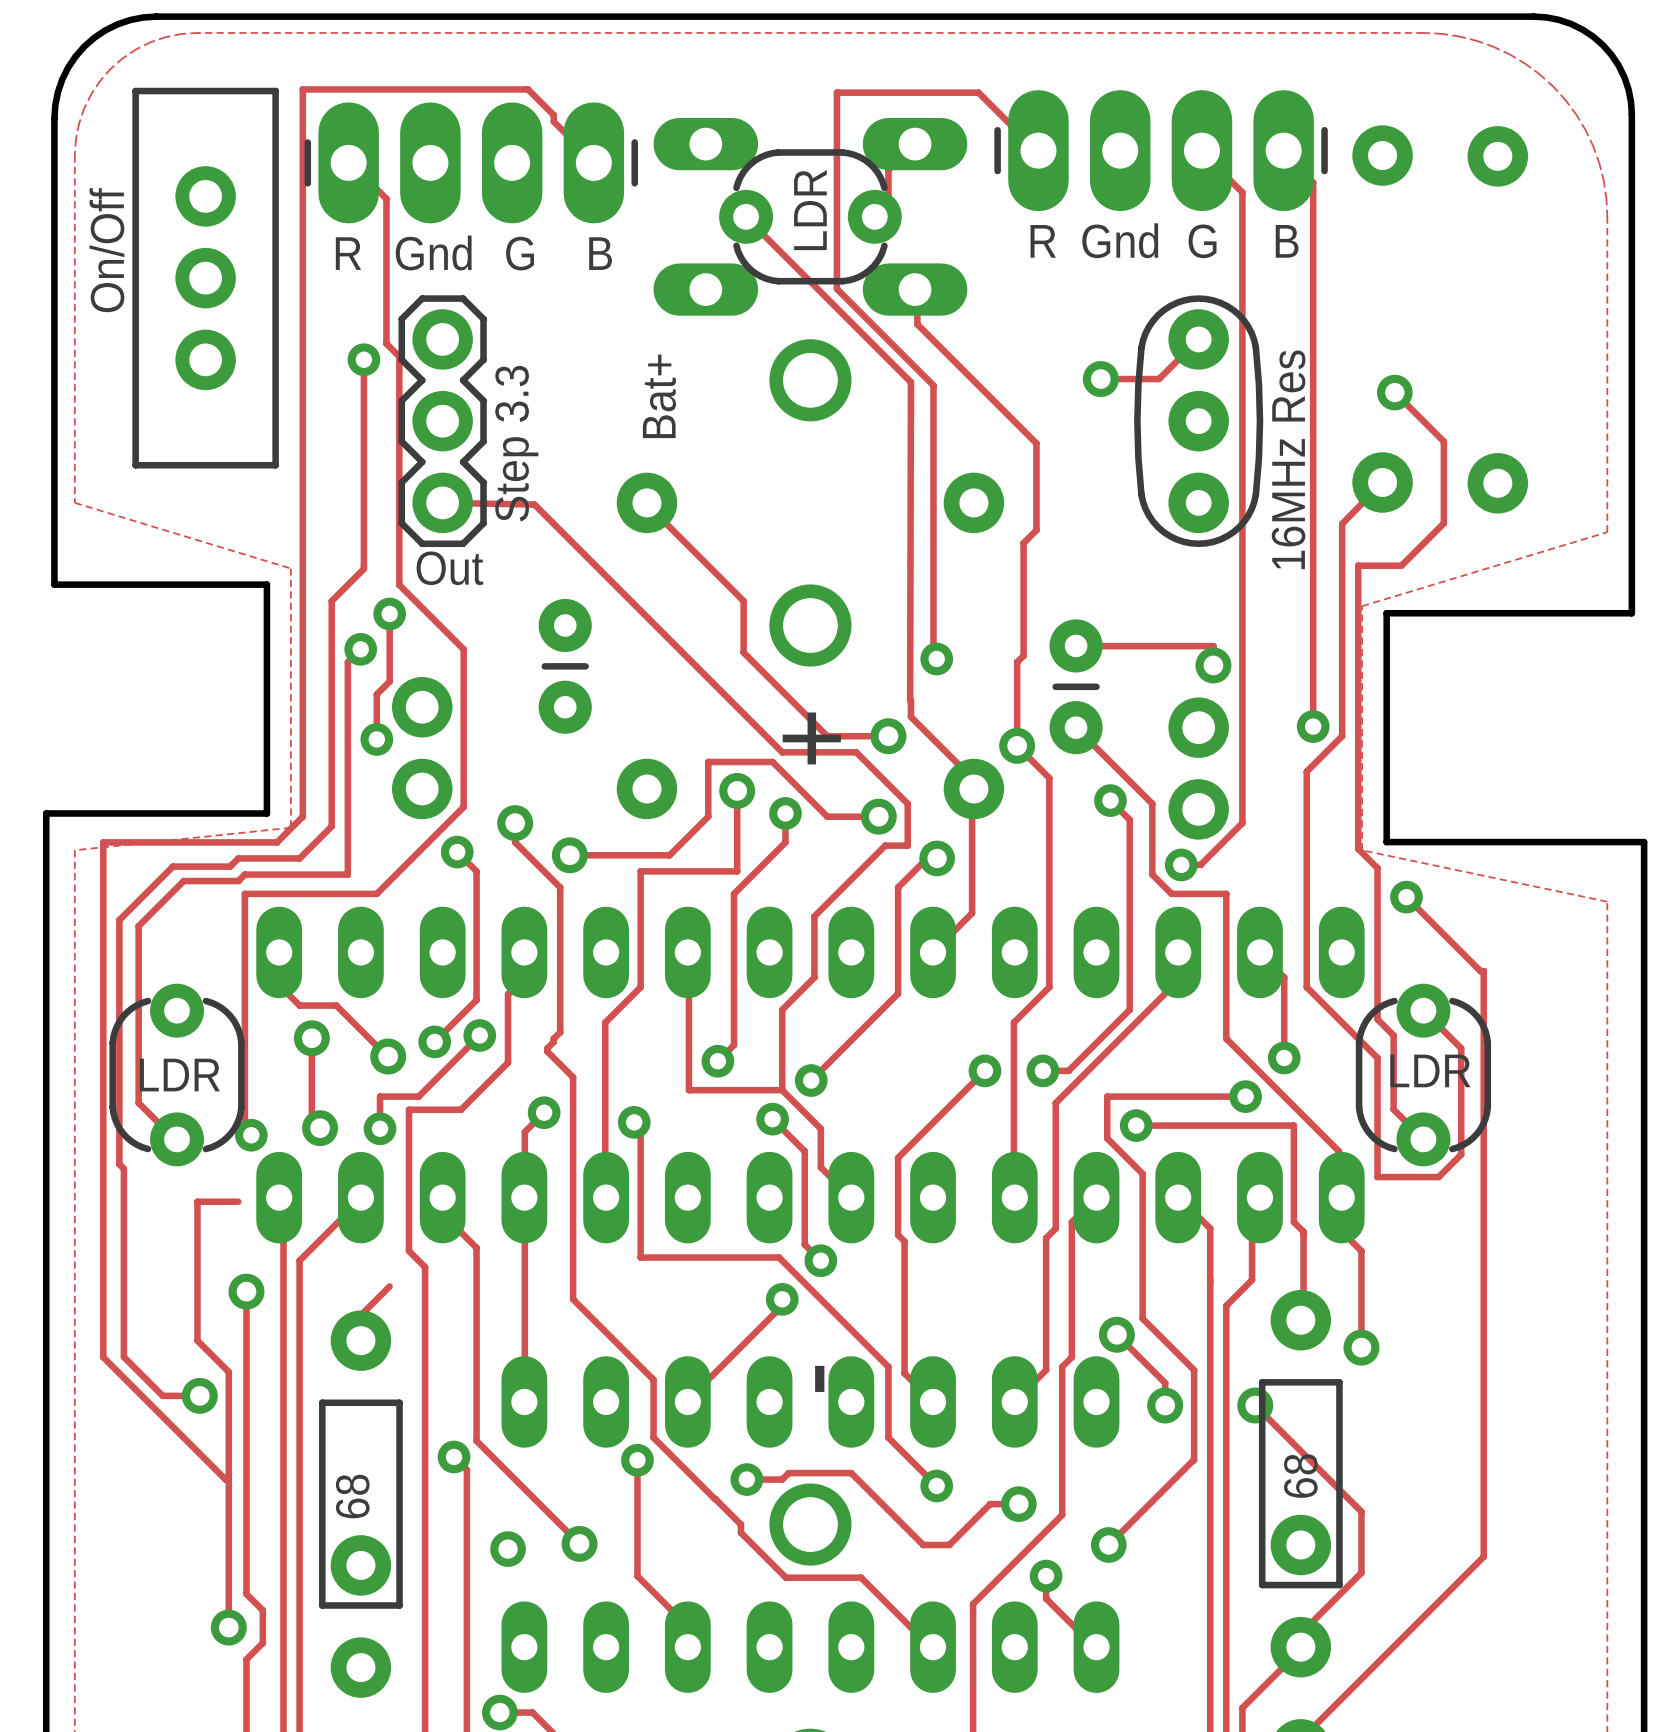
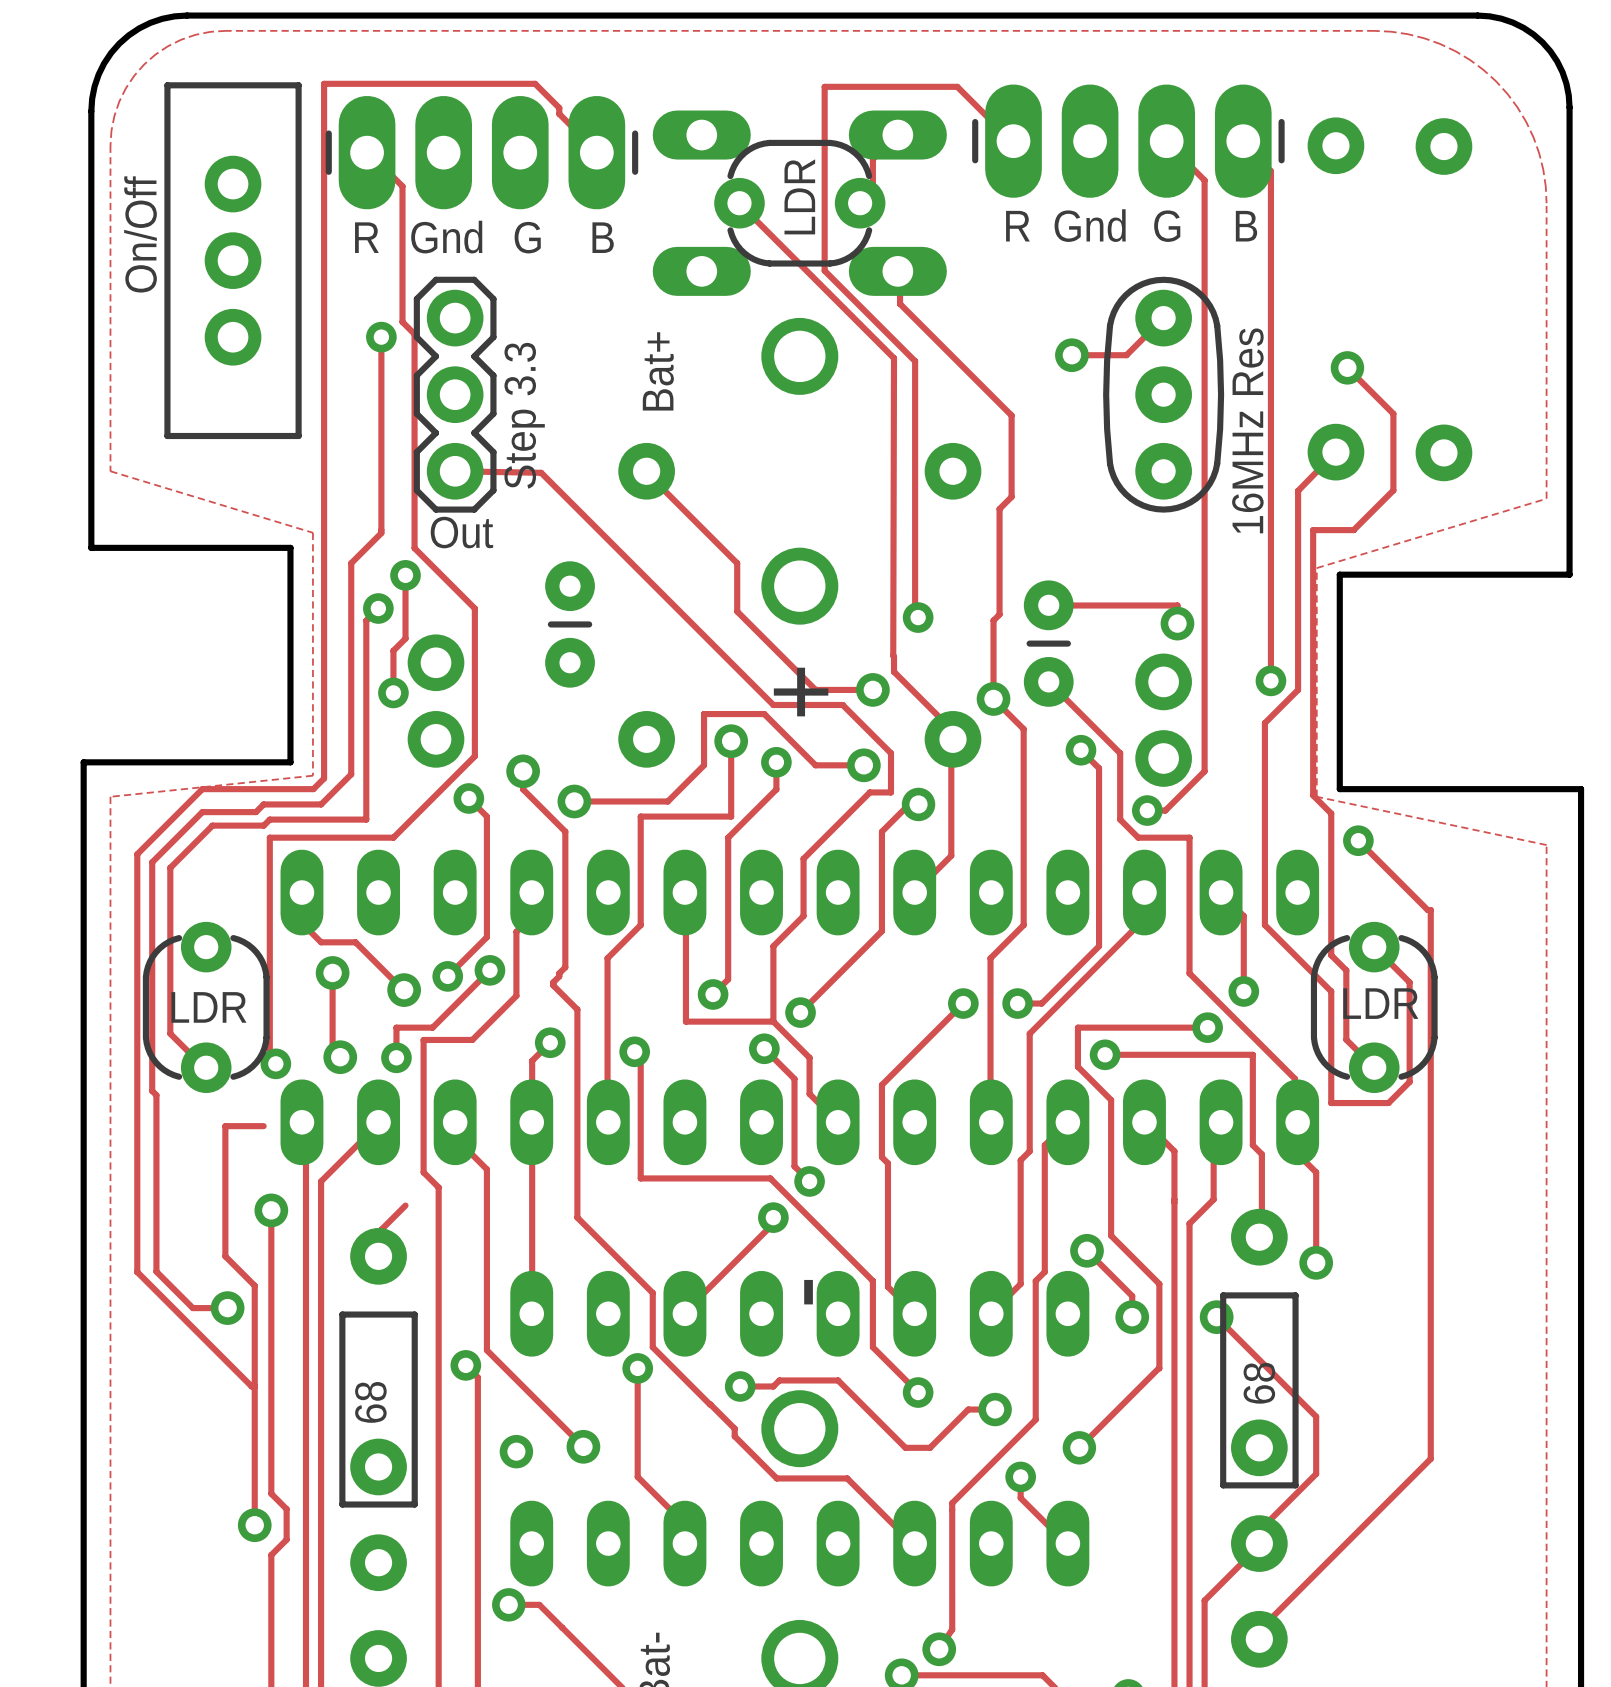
track: (302, 816) (277, 842) (103, 842) (103, 1357) -> (324, 765) (324, 778) (313, 789) (202, 789) (137, 854) (137, 1271)

